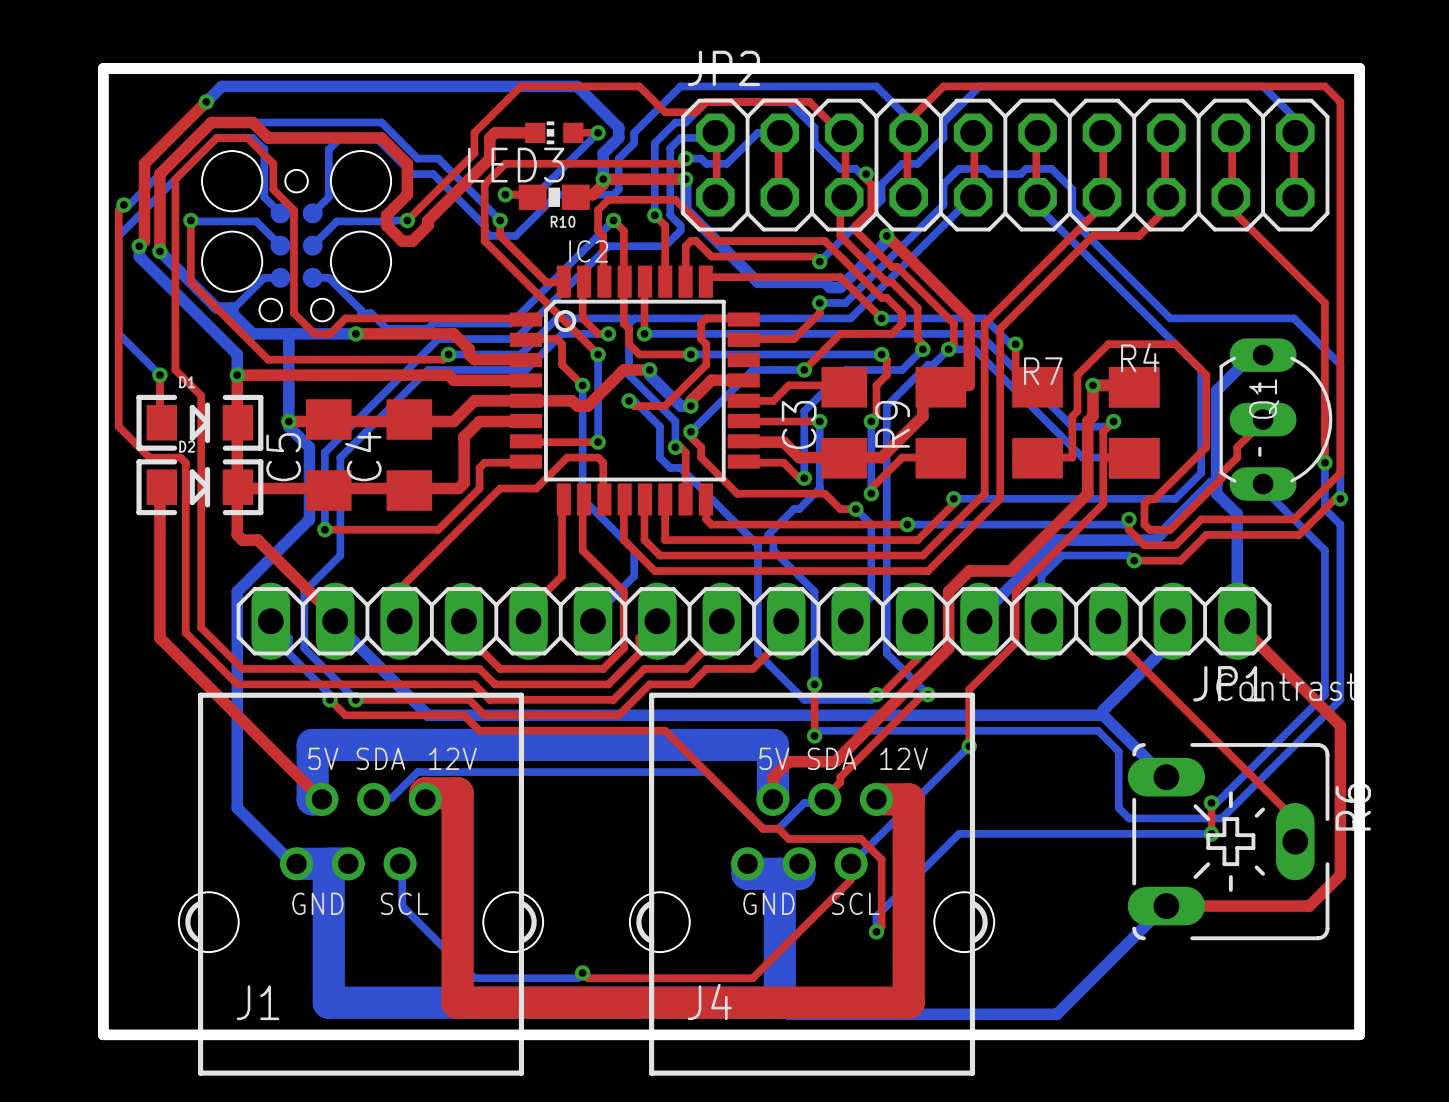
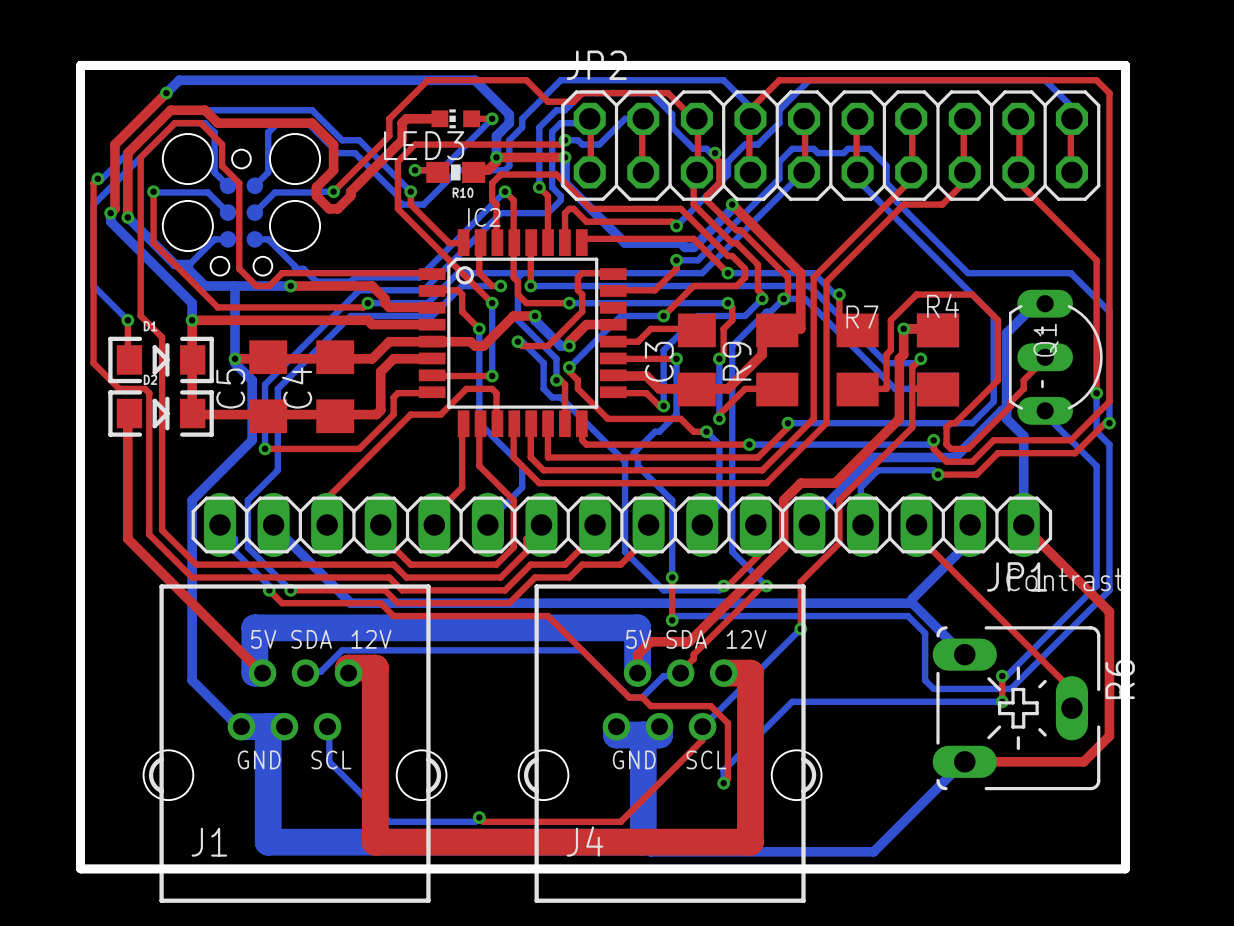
top track: (237, 487) (237, 534) (242, 540) (257, 540) (335, 617) (335, 621) -> none

